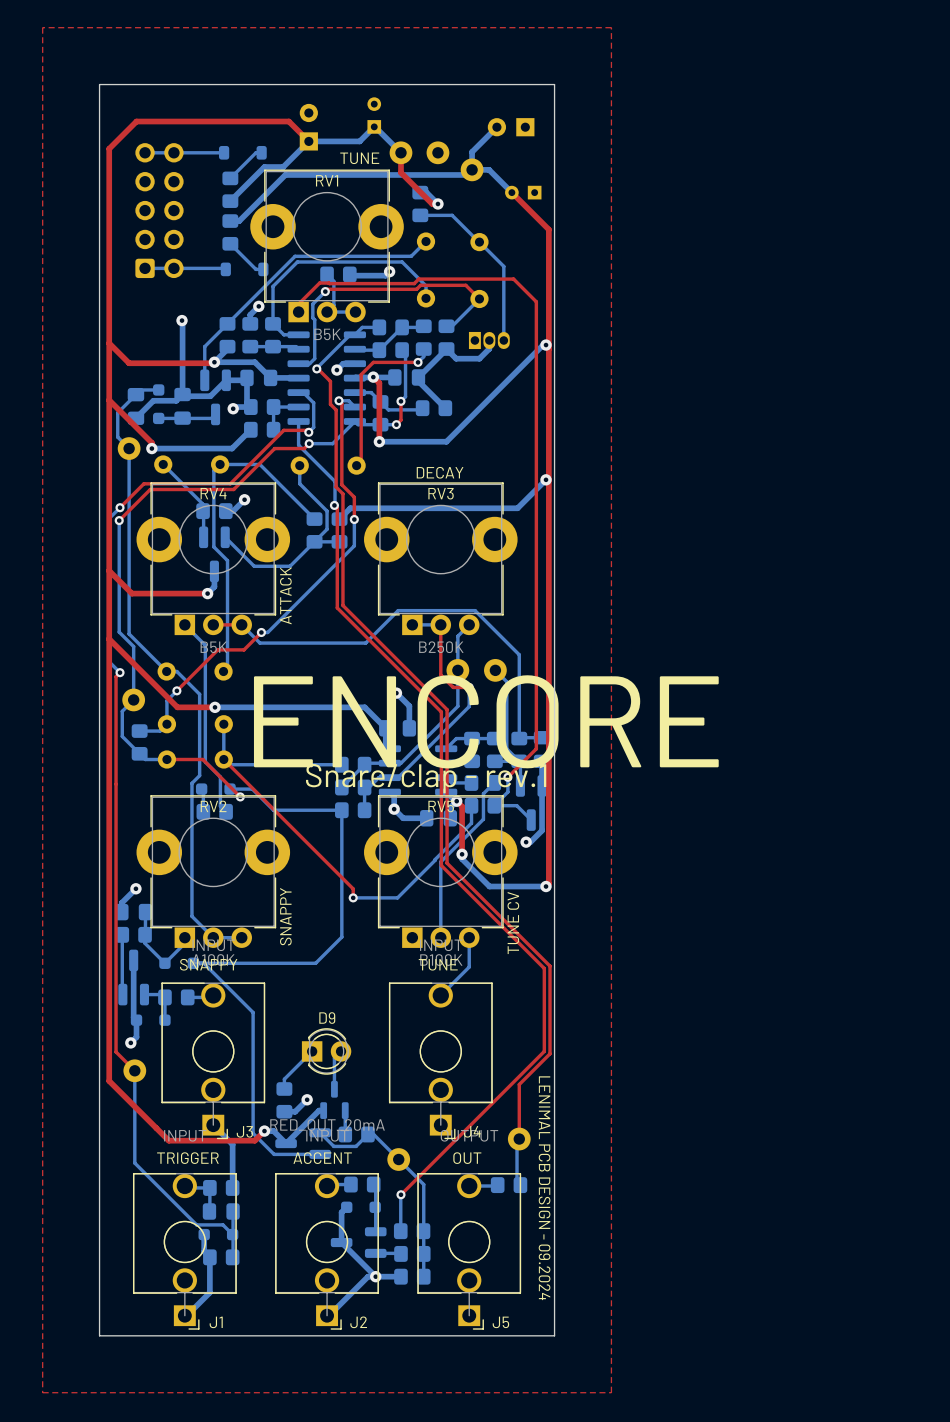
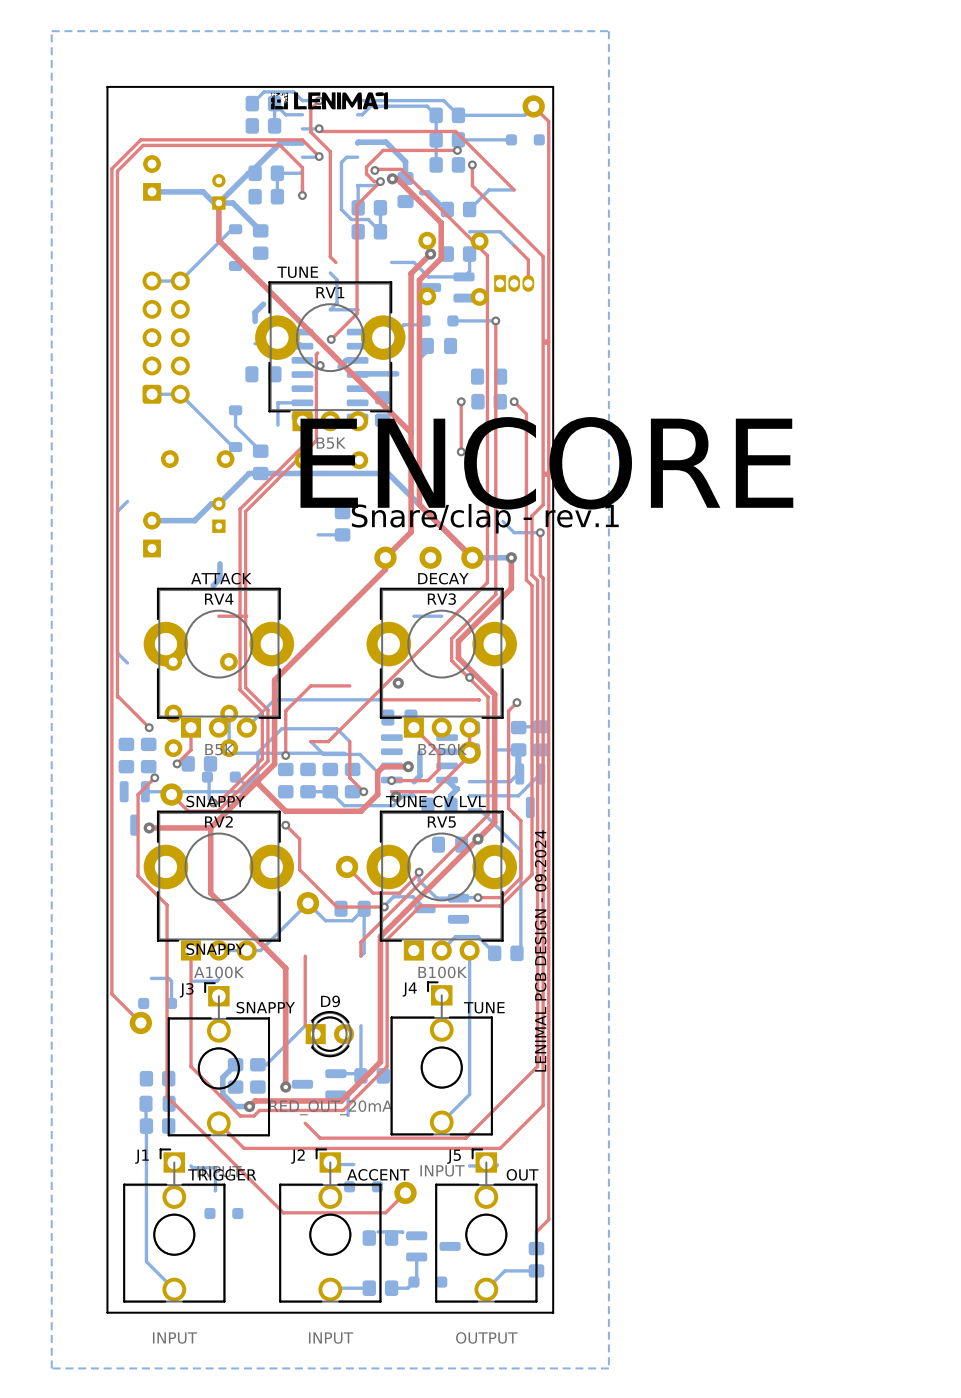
top zone outline: (42, 27) (42, 1392) (611, 1392) (611, 27) (42, 27) -> none
bottom zone outline: none -> (51, 31) (608, 31) (608, 1368) (51, 1368) (51, 31)
drawing: none -> [270, 92, 389, 110]
top track: none -> (319, 100) (310, 109) (310, 132) (330, 151) (330, 256) (335, 262)
bottom track: none -> (319, 100) (302, 100) (293, 91) (264, 91) (252, 103)
via: none -> (319, 100)
bottom track: none -> (357, 100) (443, 100) (458, 115) (524, 115) (533, 106)
part: none -> (263, 103)
part: none -> (533, 106)
bottom track: none -> (302, 114) (285, 114) (274, 103) (274, 125)
bottom track: none -> (357, 114) (362, 114) (370, 106) (427, 106) (436, 115) (436, 164)
part: none -> (447, 115)
part: (374, 115) -> none
part: none -> (263, 125)
part position: (308, 127) -> (152, 177)
top track: none -> (319, 128) (321, 131) (455, 131) (514, 189)
bottom track: none -> (319, 128) (302, 128)
via: none -> (319, 128)
bottom track: (496, 127) (472, 152) (472, 169) -> none
part: (511, 127) -> none
part: none -> (447, 139)
bottom track: none -> (511, 139) (458, 139) (457, 150)
part: none -> (525, 139)
bottom track: none -> (302, 143) (280, 143) (255, 168) (255, 173) (248, 173) (218, 203)
top track: (308, 141) (288, 121) (136, 121) (109, 148) (109, 1081) (168, 1140) (254, 1140) (264, 1131) -> none
bottom track: none -> (357, 143) (386, 142) (405, 161) (405, 178) (392, 178)
top track: none -> (457, 150) (383, 150) (366, 167) (366, 173) (374, 181) (380, 181) (357, 205) (357, 313) (331, 339)
via: none -> (457, 150)
bottom track: (145, 152) (224, 152) -> none
part: (242, 152) -> none
bottom track: (261, 152) (255, 152) (230, 178) -> none
top track: (400, 152) (400, 172) (432, 203) (437, 203) -> none
bottom track: (400, 152) (375, 126) (359, 141) (308, 141) (283, 167) (264, 167) (230, 201) -> none
part: (400, 152) -> none
part: (437, 152) -> none
top track: none -> (319, 156) (302, 139) (140, 139) (111, 168) (111, 994) (140, 1022)
bottom track: none -> (319, 156) (302, 157)
via: none -> (319, 156)
bottom track: none -> (357, 157) (346, 157) (341, 162) (341, 209) (351, 219) (368, 219) (380, 231) (380, 207)
text position: TUNE (359, 158) -> TUNE (297, 272)
part: none -> (447, 164)
top track: none -> (472, 164) (472, 185) (543, 256) (543, 504) (532, 515) (532, 575) (537, 580) (537, 1066) (465, 1138) (320, 1138) (305, 1123)
via: none -> (472, 164)
top track: none -> (374, 170) (401, 169) (487, 255) (487, 582) (328, 741) (310, 741)
via: none -> (374, 170)
bottom track: (472, 169) (466, 174) (285, 174) (239, 221) (230, 221) -> none
bottom track: (472, 169) (489, 169) (511, 192) -> none
part: (472, 169) -> none
bottom track: none -> (302, 171) (300, 173) (277, 173) (277, 196)
part: none -> (266, 173)
top track: none -> (392, 178) (397, 178) (441, 222) (441, 258) (419, 280) (419, 504) (472, 557)
via: none -> (392, 178)
bottom track: none -> (380, 181) (376, 185) (357, 185) (358, 207)
via: none -> (380, 181)
part: (230, 189) -> none
part: none -> (405, 189)
bottom track: none -> (514, 189) (489, 189) (469, 209)
bottom track: none -> (152, 191) (203, 191) (214, 203) (232, 203) (260, 230)
part: none -> (218, 191)
top track: (511, 192) (548, 229) (548, 883) (546, 886) -> none
part: (523, 192) -> none
top track: none -> (302, 195) (302, 167) (280, 145) (143, 145) (117, 171) (117, 697) (149, 727)
via: none -> (302, 195)
part: none -> (266, 196)
top track: none -> (218, 203) (218, 240) (411, 432)
part: (420, 203) -> none
via: (437, 203) -> none
part: none -> (369, 207)
part: none -> (458, 209)
part position: (159, 210) -> (166, 337)
bottom track: (420, 215) (452, 215) (503, 266) (503, 340) -> none
bottom track: none -> (235, 229) (232, 229) (180, 281) (152, 281)
part: (230, 232) -> none
part: none -> (369, 231)
bottom track: none -> (469, 231) (500, 231) (514, 245)
bottom track: (426, 241) (411, 256) (295, 256) (204, 346) (204, 380) -> none
part: none -> (260, 242)
bottom track: (230, 243) (255, 269) (263, 269) -> none
RV1 position: (327, 245) -> (330, 356)
top track: none -> (514, 245) (528, 259) (528, 283)
top track: none -> (430, 254) (411, 273) (411, 532) (385, 557) (385, 569) (274, 680) (274, 764) (210, 827)
via: none -> (430, 254)
part: none -> (458, 254)
bottom track: none -> (469, 254) (469, 271) (464, 276) (428, 276) (413, 262) (391, 262)
bottom track: (145, 268) (225, 269) -> none
part rotation: 0° (244, 269) -> 90° clockwise (235, 247)
bottom track: (389, 271) (385, 275) (349, 274) -> none
via: (389, 271) -> none
part: (338, 274) -> none
part: none -> (447, 287)
top track: (325, 291) (327, 289) (416, 289) (420, 285) (465, 285) (479, 298) -> none
bottom track: (325, 291) (312, 304) (314, 358) (309, 363) (298, 363) -> none
via: (325, 291) -> none
bottom track: (426, 298) (426, 285) (402, 262) (297, 262) (273, 286) (273, 323) (283, 334) (298, 334) -> none
bottom track: (479, 298) (452, 326) (446, 326) -> none
via: (258, 306) -> none
top track: (298, 312) (298, 304) (319, 283) (414, 283) (418, 279) (513, 279) (536, 301) (536, 748) (507, 777) -> none
bottom track: (182, 320) (182, 394) -> none
via: (182, 320) -> none
part: none -> (438, 320)
bottom track: none -> (452, 320) (495, 320)
top track: none -> (495, 320) (495, 594) (451, 638) (451, 660) (487, 697) (487, 815) (360, 942) (360, 956)
via: none -> (495, 320)
bottom track: (379, 327) (362, 327) (354, 334) (350, 334) (316, 368) -> none
part: (390, 327) -> none
part: (227, 335) -> none
part: (250, 335) -> none
part: (273, 335) -> none
part: (423, 337) -> none
part: (446, 337) -> none
bottom track: (489, 340) (489, 348) (479, 358) (456, 358) (446, 349) (418, 377) (418, 381) (445, 408) -> none
part position: (489, 340) -> (514, 283)
via: none -> (331, 339)
top track: (109, 343) (129, 363) (214, 362) -> none
bottom track: (546, 345) (543, 345) (446, 441) (379, 441) -> none
via: (546, 345) -> none
bottom track: (227, 346) (227, 349) (214, 362) (254, 362) (270, 377) (298, 378) -> none
part: none -> (438, 346)
part: (390, 350) -> none
bottom track: (402, 350) (405, 353) (405, 396) (400, 401) -> none
top track: none -> (317, 352) (316, 440) (245, 511) (245, 687) (267, 709) (267, 761) (217, 811) (188, 811) (171, 794)
via: (214, 362) -> none
top track: (418, 362) (373, 362) (361, 374) (361, 461) (356, 465) -> none
via: (418, 362) -> none
top track: (316, 368) (330, 381) (330, 404) (336, 410) (336, 487) (342, 493) (342, 605) (447, 709) (447, 863) (550, 966) -> (533, 106) (548, 121) (548, 950)
via: (336, 370) -> none
top track: (373, 377) (379, 383) (379, 441) -> none
via: (373, 377) -> none
part: (406, 377) -> none
part: none -> (489, 376)
bottom track: (158, 389) (140, 389) (117, 412) (117, 437) (129, 448) (129, 633) (166, 671) (176, 671) (199, 694) (199, 775) (191, 783) (191, 916) (213, 937) (241, 937) -> none
bottom track: (298, 392) (303, 392) (313, 402) (313, 427) (308, 432) -> none
bottom track: (354, 392) (371, 392) (388, 409) (420, 409) (422, 408) -> none
bottom track: (182, 394) (184, 396) (210, 396) (226, 380) (244, 380) (246, 377) (246, 403) (250, 407) (234, 407) (233, 408) -> none
bottom track: (182, 394) (176, 400) (153, 400) (135, 418) -> none
part: (215, 397) -> none
bottom track: none -> (152, 394) (180, 394) (233, 447) (235, 447)
top track: (109, 400) (151, 442) (151, 448) -> none
top track: (338, 400) (341, 403) (341, 484) (354, 497) (354, 519) -> none
bottom track: (338, 400) (348, 400) (354, 407) -> none
via: (338, 400) -> none
top track: (400, 401) (400, 420) (396, 424) -> none
via: (400, 401) -> none
part: (158, 404) -> none
top track: none -> (461, 401) (461, 451)
via: none -> (461, 401)
part: none -> (489, 401)
top track: none -> (514, 401) (526, 413) (526, 580) (532, 585) (532, 874) (500, 905) (420, 905) (387, 939) (387, 1066) (343, 1110) (259, 1110) (253, 1116) (240, 1116) (191, 1066) (191, 950)
via: none -> (514, 401)
part: (135, 406) -> none
part: (182, 406) -> none
part: (262, 407) -> none
via: (233, 408) -> none
part: (433, 408) -> none
bottom track: (215, 414) (211, 418) (158, 418) -> none
bottom track: none -> (235, 410) (235, 426) (260, 451)
bottom track: (298, 421) (298, 445) (335, 481) (334, 505) -> none
bottom track: (396, 424) (358, 424) (354, 421) (332, 443) (309, 443) -> none
via: (396, 424) -> none
top track: none -> (302, 421) (302, 446) (240, 509) (240, 689) (262, 712) (262, 759) (218, 802) (213, 802)
bottom track: (250, 429) (232, 448) (151, 448) -> none
part: (262, 429) -> none
top track: (308, 432) (306, 430) (283, 430) (230, 483) (143, 483) (120, 507) -> none
via: (308, 432) -> none
part: none -> (235, 428)
via: (379, 441) -> none
top track: (309, 443) (304, 448) (274, 448) (233, 489) (150, 489) (119, 520) -> none
via: (309, 443) -> none
part: (129, 448) -> none
via: (151, 448) -> none
via: none -> (461, 451)
bottom track: (163, 464) (203, 504) (203, 537) -> none
bottom track: (299, 465) (299, 483) (327, 511) (327, 529) (290, 566) (254, 566) (225, 537) -> none
part: none -> (260, 462)
text position: DECAY (440, 472) -> DECAY (443, 578)
bottom track: (546, 479) (517, 508) (350, 508) (339, 519) -> none
via: (546, 479) -> none
bottom track: (244, 499) (233, 511) (225, 511) -> none
via: (244, 499) -> none
part footprint: [196, 503, 233, 520] -> [212, 497, 226, 533]
top track: (334, 505) (337, 508) (337, 607) (441, 711) (441, 865) (544, 968) -> (540, 532) (540, 575) (543, 578) (543, 952)
via: (334, 505) -> none
via: (120, 507) -> none
bottom track: (314, 519) (259, 464) (220, 464) (213, 470) (213, 546) (227, 560) (227, 667) (223, 671) -> none
bottom track: (354, 519) (354, 545) (267, 632) (261, 632) -> none
via: (354, 519) -> none
bottom track: (119, 520) (119, 632) (133, 646) (133, 699) (122, 711) (122, 736) (145, 759) (166, 759) -> none
via: (119, 520) -> none
bottom track: none -> (152, 520) (194, 520) (211, 503) (218, 503) (249, 473) (388, 473) (472, 557) (511, 557)
bottom track: none -> (503, 521) (514, 532) (540, 532)
part: (314, 530) -> none
via: none -> (540, 532)
part: none -> (152, 534)
part: (214, 554) -> none
RV4 position: (213, 558) -> (218, 662)
RV3 position: (440, 558) -> (441, 662)
part: none -> (385, 557)
part: none -> (430, 557)
part: none -> (472, 557)
top track: none -> (511, 557) (511, 588) (458, 641) (458, 658) (494, 694) (494, 822) (380, 936) (380, 1061) (341, 1100) (255, 1100) (249, 1106)
via: none -> (511, 557)
top track: (109, 570) (131, 593) (207, 593) -> none
via: (207, 593) -> none
text rotation: 0° (285, 595) -> 90° clockwise (221, 578)
bottom track: (184, 624) (205, 645) (205, 761) (220, 777) (220, 806) (226, 811) -> none
bottom track: (241, 624) (259, 643) (365, 643) (398, 610) (475, 610) (519, 654) (519, 738) -> none
top track: (440, 624) (440, 675) (453, 687) (469, 687) -> none
bottom track: (469, 624) (457, 636) (457, 706) (400, 763) (366, 763) (341, 787) -> none
top track: (261, 632) (244, 649) (217, 649) (176, 690) -> none
via: (261, 632) -> none
top track: (109, 639) (177, 707) (215, 707) -> none
part: (457, 670) -> none
bottom track: (495, 670) (506, 681) (506, 748) (519, 761) -> none
part: (495, 670) -> none
top track: (120, 672) (116, 676) (116, 1052) (134, 1070) -> none
via: (120, 672) -> none
bottom track: (469, 687) (469, 706) (398, 777) (378, 777) (364, 791) (364, 810) -> none
bottom track: (176, 690) (166, 700) (166, 724) (160, 731) (139, 731) -> none
via: (176, 690) -> none
bottom track: (396, 693) (409, 706) (409, 728) -> none
top track: none -> (349, 685) (310, 685) (285, 710) (285, 755)
part position: (133, 699) -> (171, 794)
bottom track: (215, 707) (364, 707) (385, 728) (385, 744) (389, 748) -> none
via: (215, 707) -> none
bottom track: none -> (381, 700) (274, 699) (246, 727)
top track: none -> (479, 700) (381, 700)
top track: none -> (516, 702) (508, 710) (508, 808) (520, 820) (520, 877) (501, 897) (477, 897)
via: none -> (516, 702)
text position: ENCORE (486, 721) -> ENCORE (546, 463)
via: none -> (149, 727)
top track: none -> (191, 727) (191, 749) (177, 763)
top track: none -> (413, 727) (438, 752) (438, 769) (427, 780) (391, 780)
top track: none -> (469, 727) (469, 755) (433, 791) (391, 791)
bottom track: (494, 738) (456, 738) (446, 748) -> none
part: (139, 742) -> none
part: (494, 749) -> none
bottom track: none -> (310, 741) (323, 754) (359, 754) (374, 769)
top track: none -> (349, 741) (349, 777) (363, 791)
bottom track: none -> (349, 741) (336, 728) (281, 728) (257, 752) (257, 775) (241, 791) (145, 791)
top track: (166, 759) (202, 759) (240, 796) -> none
top track: (223, 759) (353, 888) (353, 897) -> none
bottom track: none -> (516, 749) (516, 775) (510, 781) (469, 781)
bottom track: (543, 761) (542, 830) (530, 842) (526, 842) -> none
part: (353, 764) -> none
bottom track: none -> (419, 752) (419, 775) (414, 781)
part: none -> (469, 752)
part: none -> (126, 755)
part: none -> (148, 755)
via: none -> (285, 755)
via: none -> (177, 763)
part: none -> (199, 763)
bottom track: (446, 777) (451, 782) (471, 782) -> none
bottom track: (507, 777) (507, 792) (494, 805) (516, 805) (531, 820) -> none
via: (507, 777) -> none
top track: none -> (408, 766) (383, 766) (377, 772) (377, 794) (360, 811) (285, 811) (256, 782)
via: none -> (408, 766)
text position: Snare/clap - rev.1 (426, 778) -> Snare/clap - rev.1 (485, 518)
part: (482, 782) -> none
bottom track: (494, 782) (483, 793) (483, 819) (440, 861) (440, 937) -> none
bottom track: none -> (539, 775) (518, 795) (469, 795)
part rotation: 0° (353, 787) -> 90° clockwise (352, 780)
top track: none -> (154, 777) (138, 794) (138, 876) (167, 905) (167, 1096) (283, 1212) (385, 1212) (405, 1192)
via: none -> (154, 777)
bottom track: (230, 789) (252, 789) (273, 810) (341, 810) (341, 937) (315, 963) (193, 963) -> none
part: none -> (285, 780)
part: none -> (308, 780)
part: none -> (330, 780)
bottom track: (389, 792) (394, 796) (394, 809) (403, 818) (426, 818) -> none
via: none -> (391, 780)
via: (240, 796) -> none
top track: (456, 801) (462, 806) (462, 854) -> none
via: (456, 801) -> none
bottom track: none -> (308, 791) (330, 791) (344, 805) (393, 805) (403, 795) (414, 795) (410, 791) (391, 791)
via: none -> (363, 791)
bottom track: (471, 805) (471, 823) (397, 897) (353, 897) -> none
part: (482, 805) -> none
part: (353, 810) -> none
part: (214, 811) -> none
text: none -> SNAPPY (215, 801)
text: none -> TUNE CV LVL (435, 801)
via: none -> (213, 802)
part: none -> (134, 808)
bottom track: none -> (469, 809) (480, 809) (520, 850) (520, 949) (516, 953)
top track: none -> (285, 825) (299, 839) (299, 869) (336, 907) (384, 907)
via: none -> (285, 825)
top track: none -> (149, 827) (210, 827)
top track: none -> (210, 827) (210, 893) (285, 968) (285, 1087)
via: (526, 842) -> none
bottom track: (462, 854) (462, 859) (489, 886) (546, 886) -> none
via position: (462, 854) -> (477, 839)
part: none -> (450, 844)
RV2 position: (213, 871) -> (218, 885)
RV5 position: (440, 871) -> (441, 885)
top track: none -> (347, 866) (373, 893) (399, 893) (419, 872)
part: none -> (347, 866)
bottom track: none -> (419, 872) (419, 880) (436, 898) (477, 897)
via: none -> (419, 872)
via: (546, 886) -> none
bottom track: (135, 888) (121, 902) (121, 912) -> none
via position: (135, 888) -> (149, 827)
via: (353, 897) -> none
part: (133, 912) -> none
bottom track: (145, 912) (145, 943) (164, 963) (184, 943) (184, 937) -> none
via: none -> (477, 897)
text: SNAPPY (285, 916) -> none
part: none -> (308, 903)
bottom track: none -> (384, 907) (393, 896) (413, 896) (425, 908)
via: none -> (384, 907)
part: none -> (352, 908)
part: none -> (441, 908)
text: TUNE CV (513, 923) -> none
bottom track: (122, 934) (122, 994) -> none
part: (133, 934) -> none
bottom track: (469, 937) (469, 966) -> none
bottom track: (133, 960) (133, 1017) (136, 1020) (136, 1037) (130, 1042) -> none
part: (179, 963) -> none
bottom track: (203, 963) (253, 1012) (253, 1133) (274, 1154) (320, 1154) -> none
text position: TUNE (438, 964) -> TUNE (484, 1007)
bottom track: none -> (218, 950) (260, 950) (308, 903) (325, 920) (352, 920) (364, 908) (364, 952) (360, 956)
bottom track: none -> (441, 950) (455, 936) (477, 936) (494, 953)
bottom track: (469, 967) (440, 995) -> (469, 951) (469, 1094) (441, 1122)
part: none -> (505, 953)
top track: none -> (305, 956) (305, 1025)
part: (133, 977) -> none
part: (176, 997) -> none
text: none -> SNAPPY (265, 1007)
via: (130, 1042) -> none
bottom track: none -> (305, 1025) (266, 1064) (257, 1064)
bottom track: none -> (360, 1025) (360, 1075) (358, 1073) (335, 1073)
bottom track: (312, 1051) (284, 1079) (284, 1088) -> none
bottom track: (341, 1051) (334, 1058) (334, 1089) -> none
top track: (544, 1051) (400, 1194) -> (543, 1034) (543, 1105) (500, 1148) (244, 1148) (218, 1123)
top track: (550, 1053) (519, 1084) (519, 1139) -> (548, 1036) (548, 1219) (536, 1231)
J3 rotation: 0° (213, 1060) -> 180° (218, 1059)
J4 rotation: 0° (440, 1060) -> 180° (441, 1058)
bottom track: (134, 1070) (134, 1163) (196, 1224) (222, 1224) (232, 1234) -> none
part position: (134, 1070) -> (140, 1022)
bottom track: none -> (235, 1064) (222, 1077) (222, 1094) (235, 1106) (249, 1106)
part: none -> (235, 1075)
part: none -> (257, 1075)
part: none -> (157, 1078)
bottom track: (307, 1099) (295, 1111) (284, 1111) -> none
via: (307, 1099) -> none
part: (334, 1099) -> none
part: (284, 1100) -> none
via: none -> (285, 1087)
bottom track: (323, 1110) (319, 1110) (286, 1143) (273, 1131) (264, 1131) -> none
bottom track: none -> (146, 1103) (146, 1261) (174, 1289)
part: none -> (157, 1103)
bottom track: (213, 1125) (232, 1144) (232, 1187) -> none
via: none -> (249, 1106)
via: (264, 1131) -> none
bottom track: (320, 1132) (333, 1146) (356, 1146) (368, 1134) (373, 1134) (423, 1184) (423, 1276) -> none
part position: (356, 1134) -> (372, 1075)
bottom track: (519, 1139) (517, 1141) (517, 1181) (520, 1185) -> none
part: (519, 1139) -> none
part position: (303, 1143) -> (319, 1084)
part: none -> (157, 1126)
text position: TRIGGER (187, 1158) -> TRIGGER (222, 1174)
text position: ACCENT (322, 1158) -> ACCENT (378, 1174)
text position: OUT (467, 1158) -> OUT (522, 1174)
part position: (398, 1159) -> (405, 1192)
part: (362, 1184) -> none
bottom track: (373, 1184) (375, 1186) (375, 1231) -> none
part: (509, 1185) -> none
part: (221, 1187) -> none
text rotation: 0° (544, 1188) -> 180° (540, 950)
bottom track: (400, 1194) (400, 1231) -> none
via: (400, 1194) -> none
bottom track: (346, 1207) (341, 1212) (341, 1242) (375, 1276) -> none
part: (221, 1211) -> none
bottom track: (233, 1211) (232, 1257) -> none
part: (412, 1231) -> none
bottom track: (204, 1234) (204, 1251) (209, 1257) (209, 1292) (184, 1315) -> none
part: (358, 1242) -> none
J1 rotation: 0° (184, 1251) -> 180° (174, 1225)
J2 rotation: 0° (327, 1251) -> 180° (330, 1225)
J5 rotation: 0° (469, 1251) -> 180° (486, 1225)
part: (412, 1253) -> none
part: (221, 1257) -> none
part: none -> (380, 1238)
part: none -> (433, 1246)
via: (375, 1276) -> none
bottom track: (400, 1276) (368, 1276) (327, 1315) -> none
part: (412, 1276) -> none
bottom track: none -> (416, 1256) (416, 1279) (407, 1288) (391, 1288)
part: none -> (536, 1259)
bottom track: none -> (536, 1270) (504, 1270) (486, 1289)
part: none -> (427, 1282)
bottom track: none -> (369, 1288) (330, 1289)
part: none -> (380, 1288)

